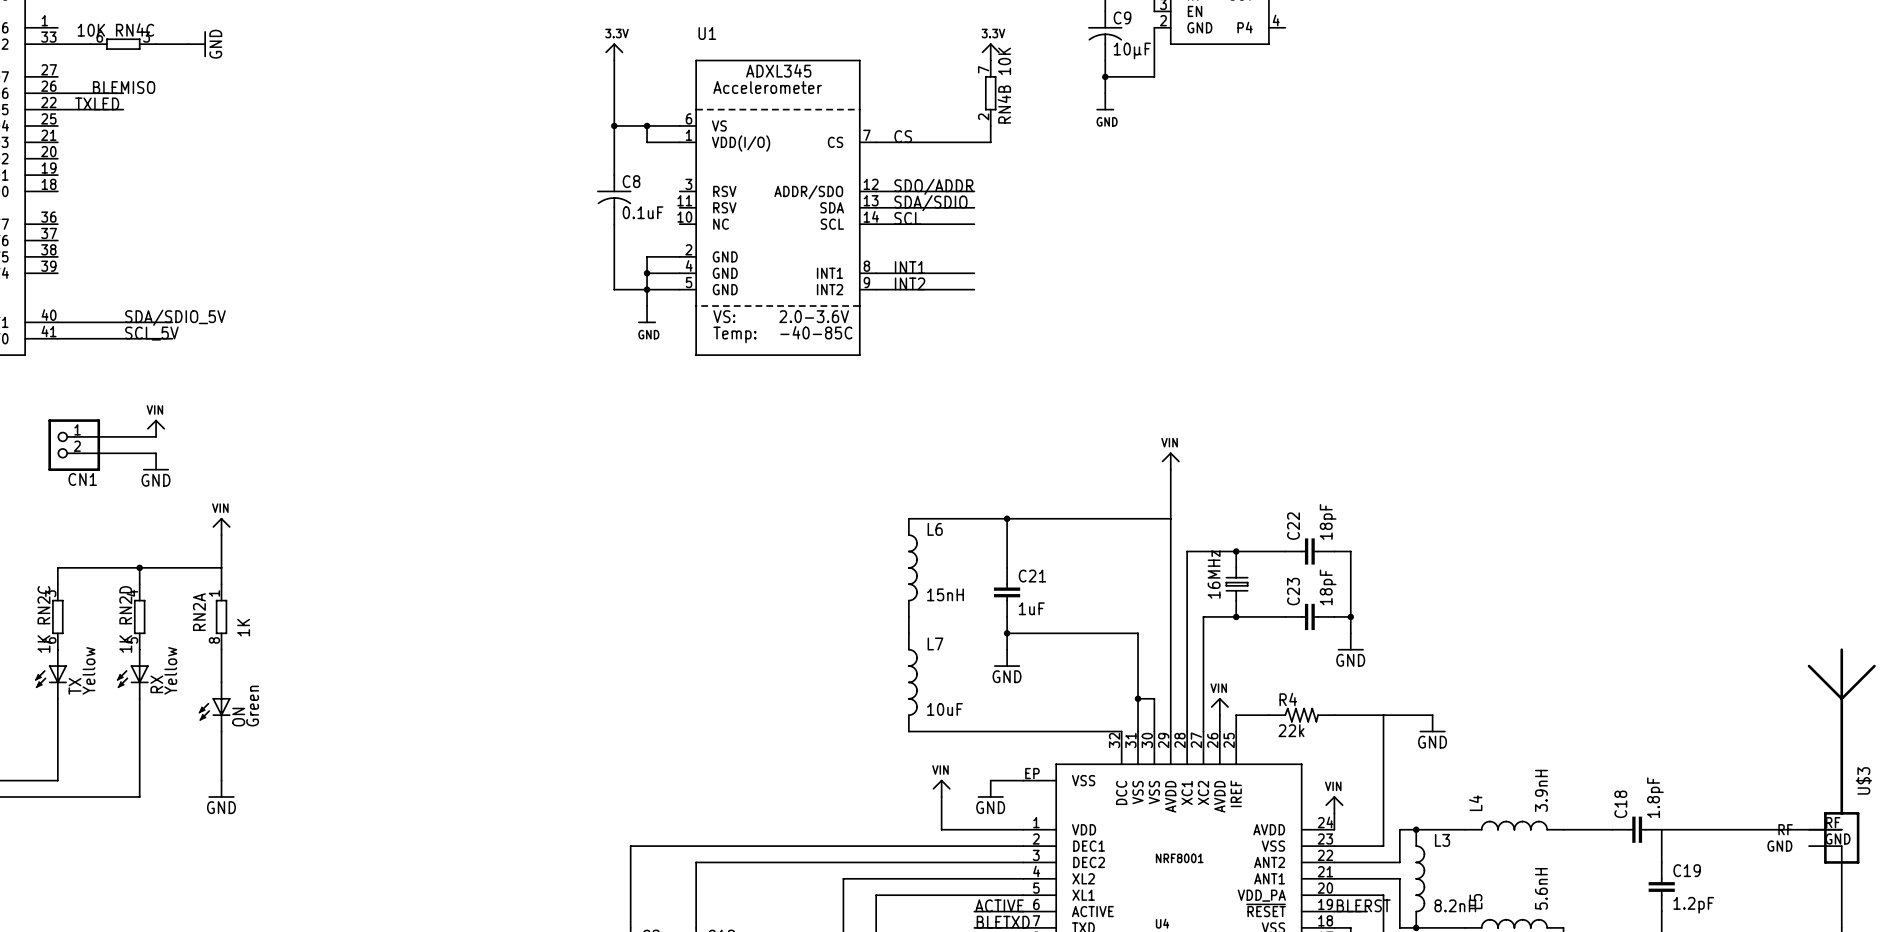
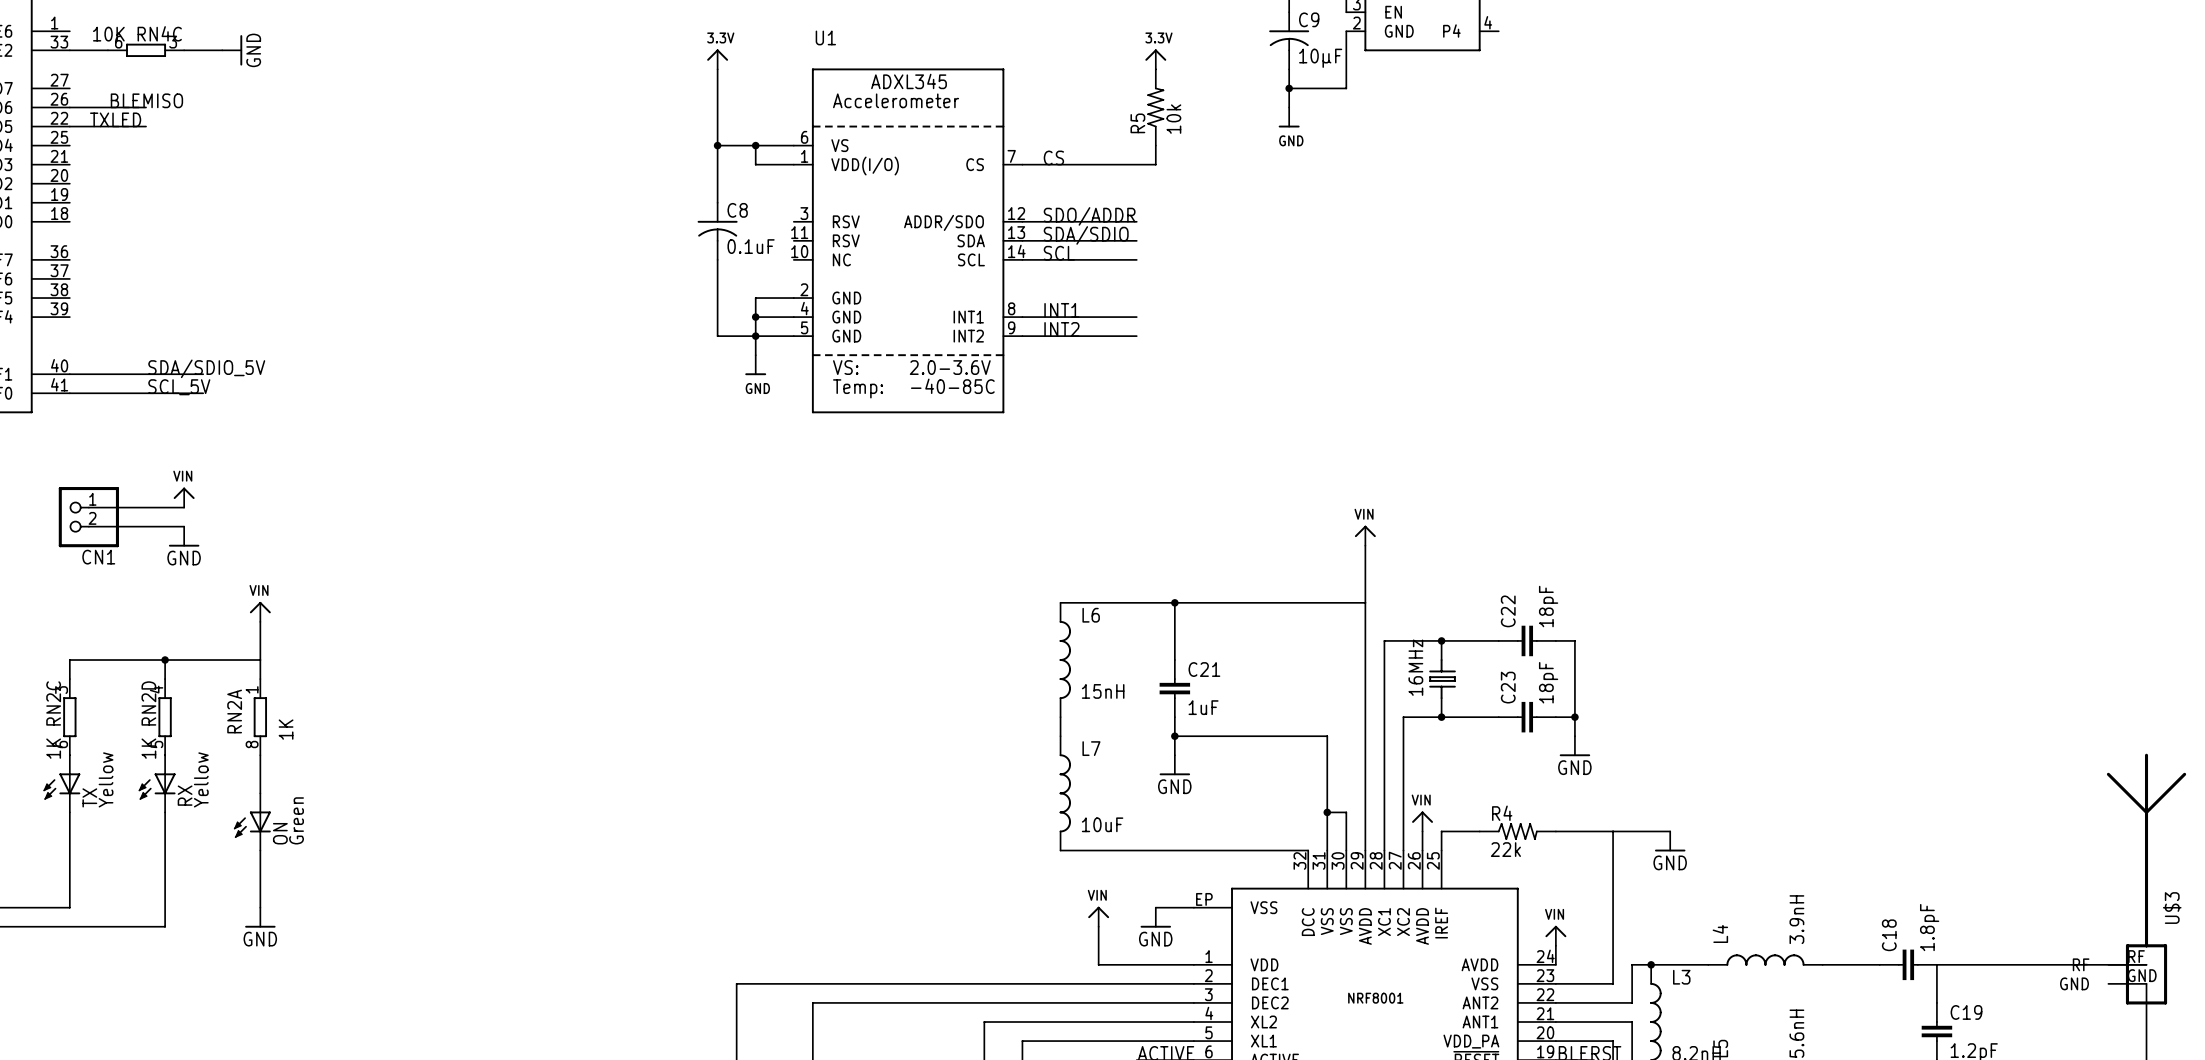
RN4B: 10K (990, 93) -> none
R5: none -> 10k (1155, 107)

